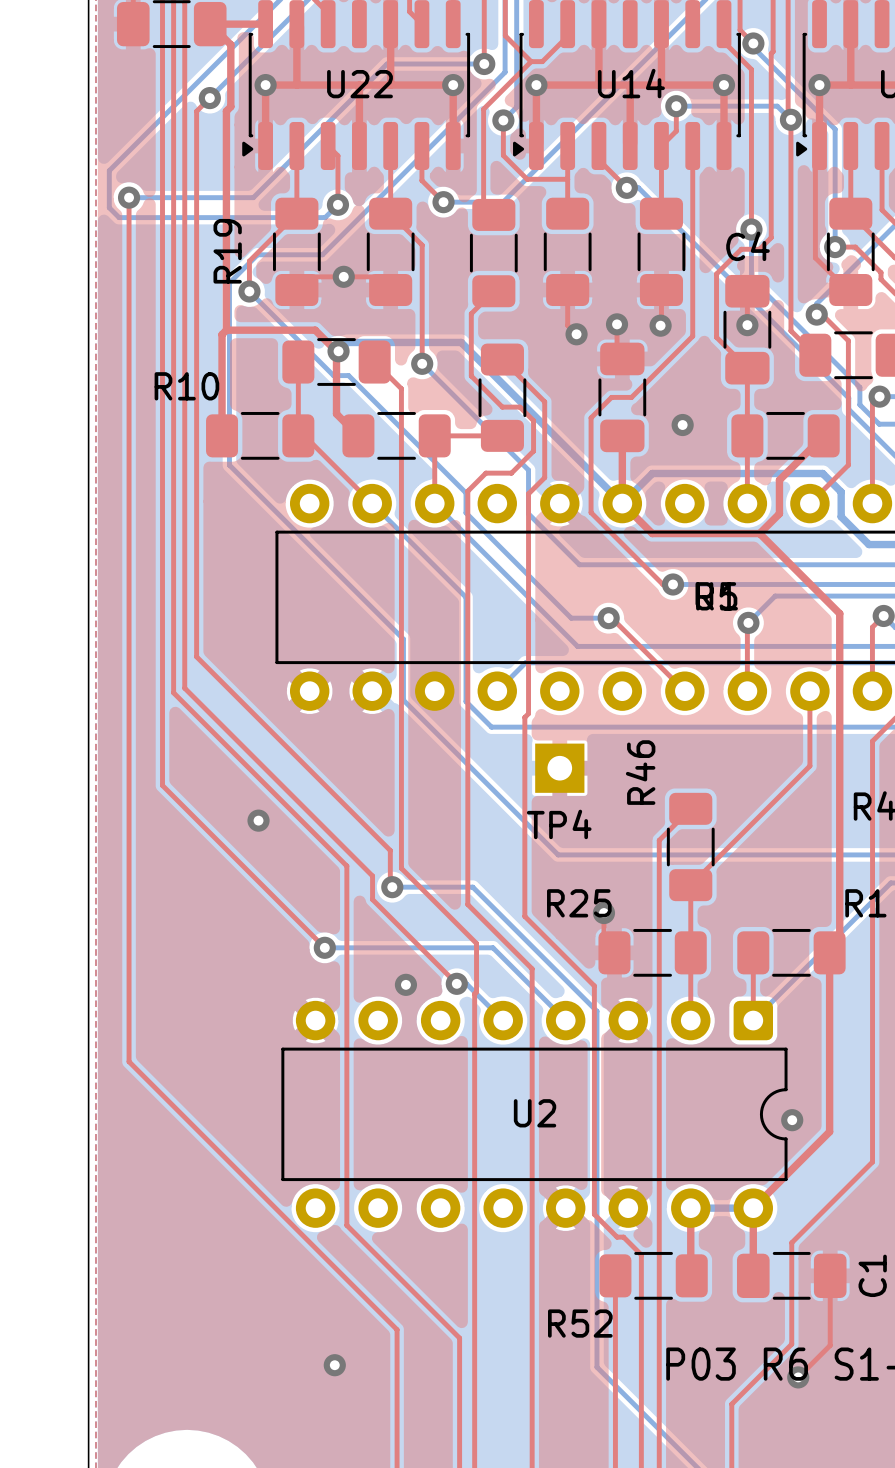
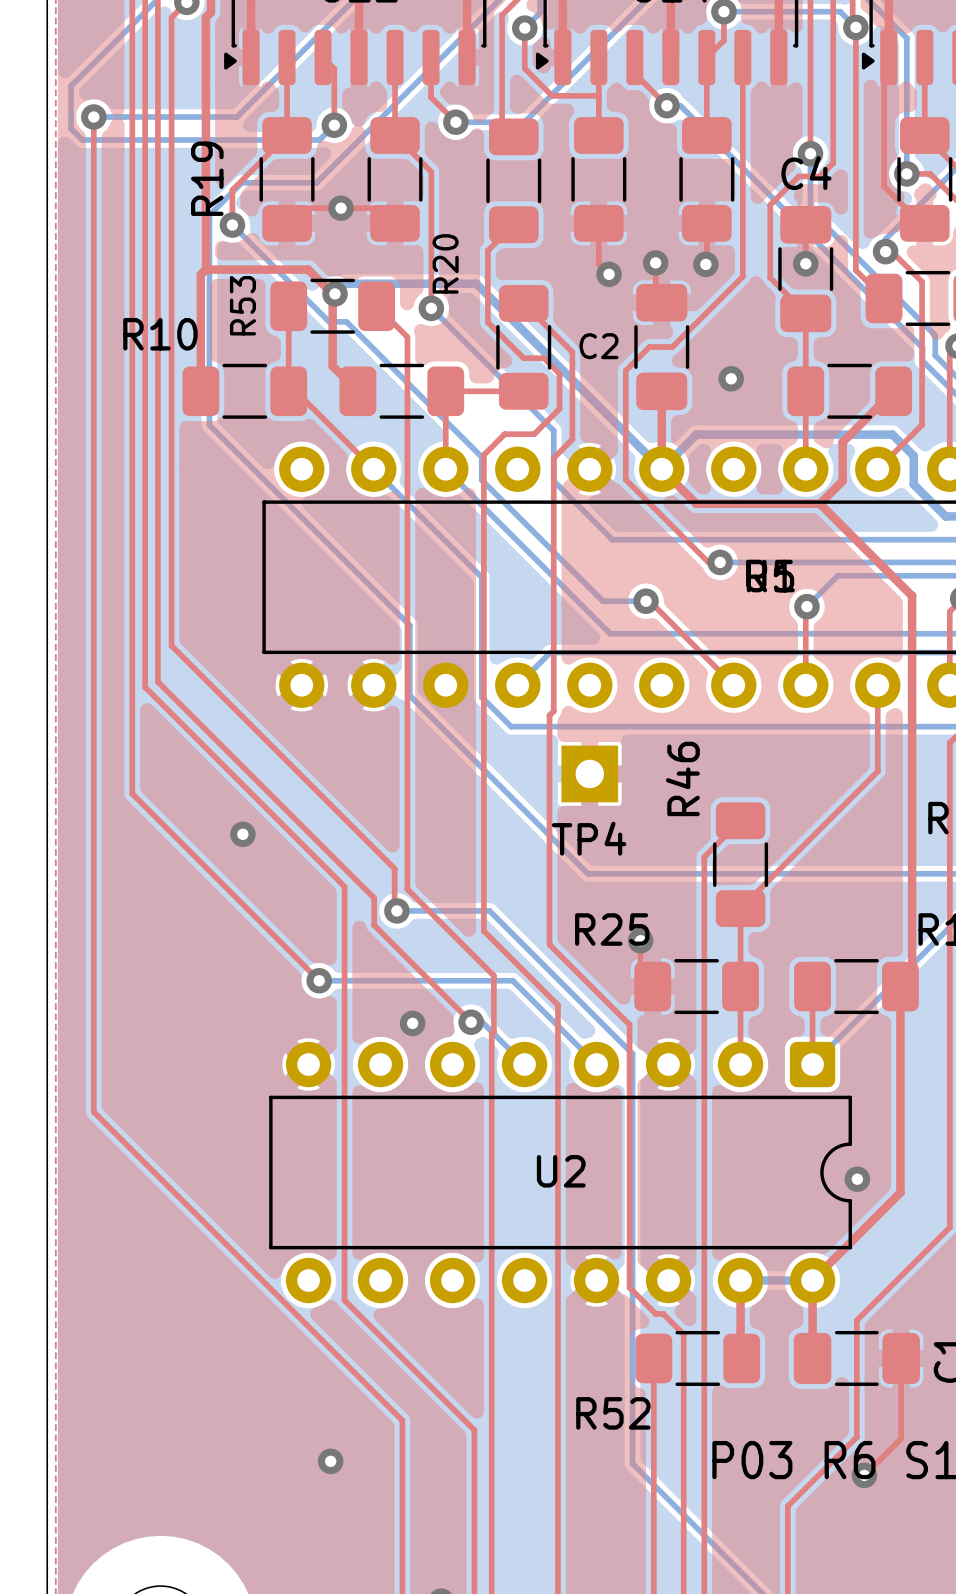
R20 name: none -> R20 (445, 263)
R53 name: none -> R53 (242, 305)
C2 name: none -> C2 (598, 346)

